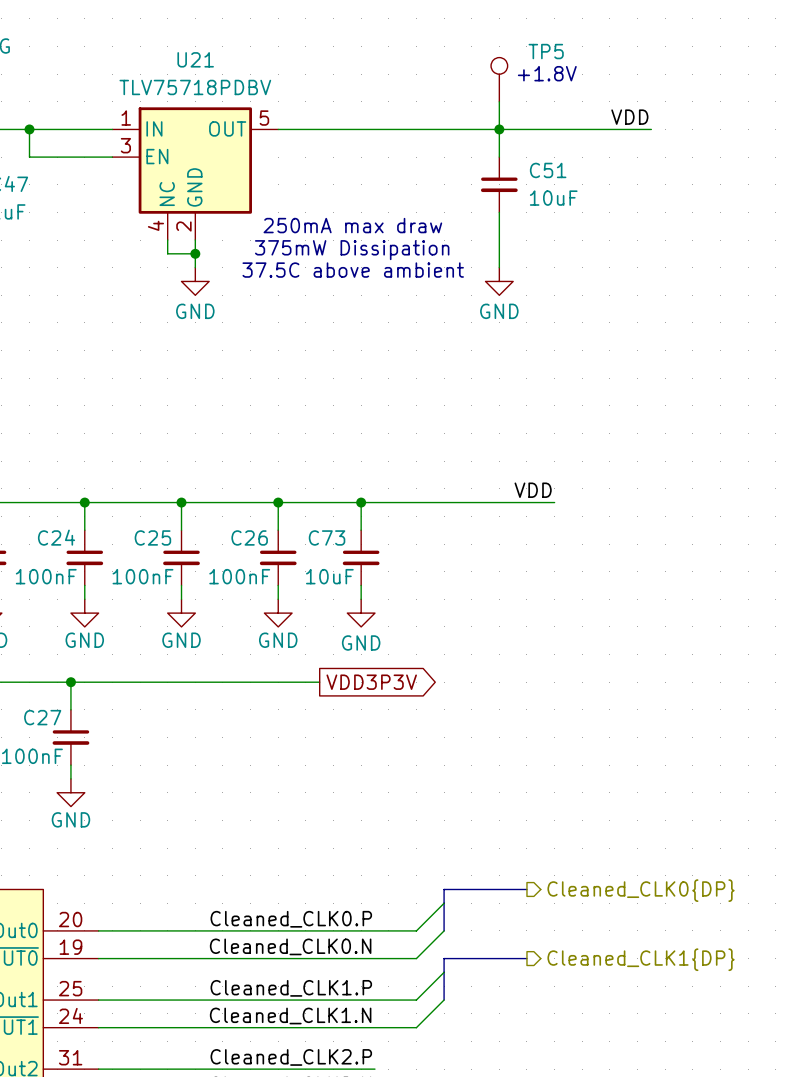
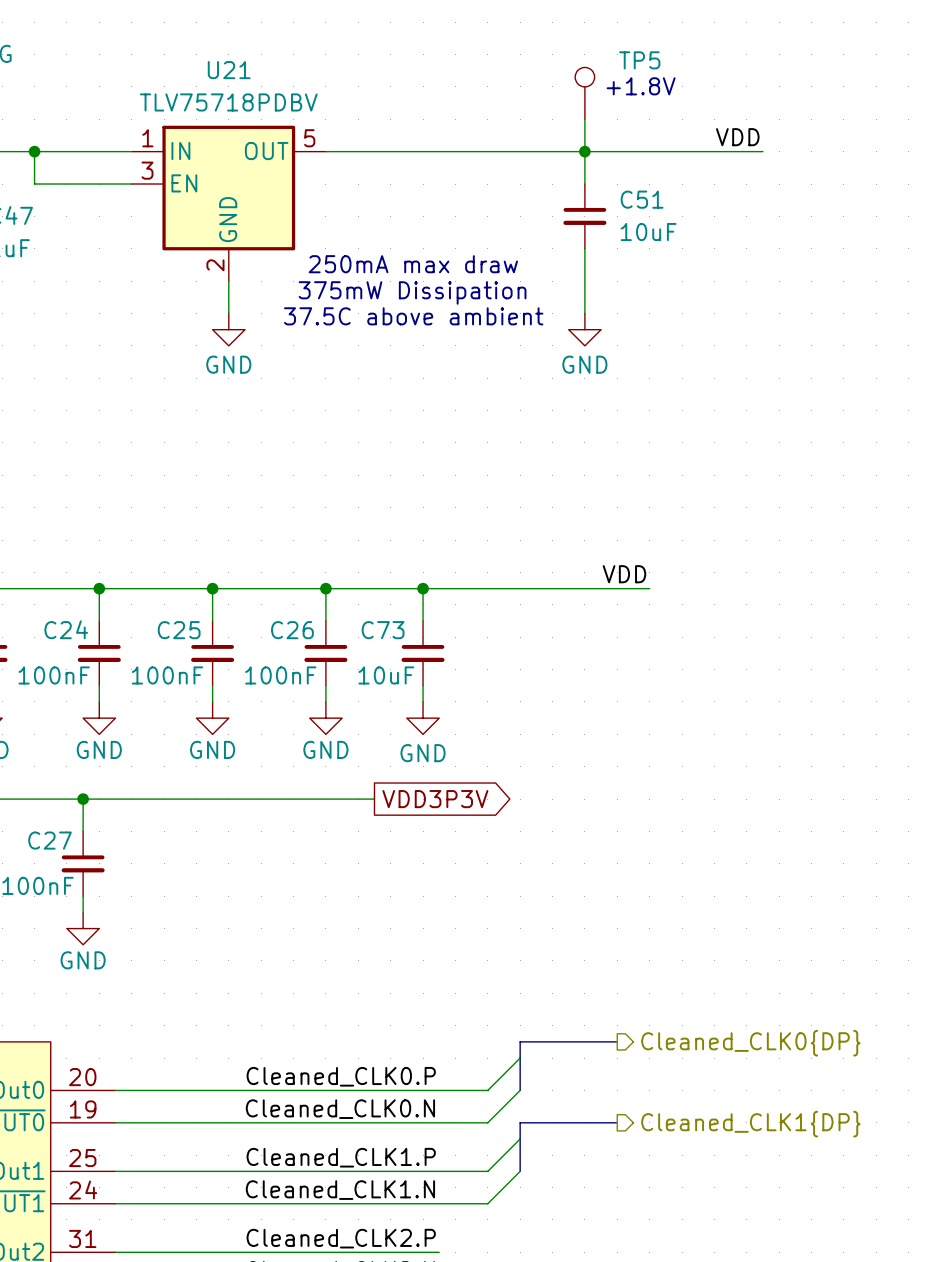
U21 symbol: [112, 107, 279, 241] -> [131, 125, 326, 282]
wire: (167, 240) (167, 253) (195, 253) -> none
junction: (195, 253) -> none

